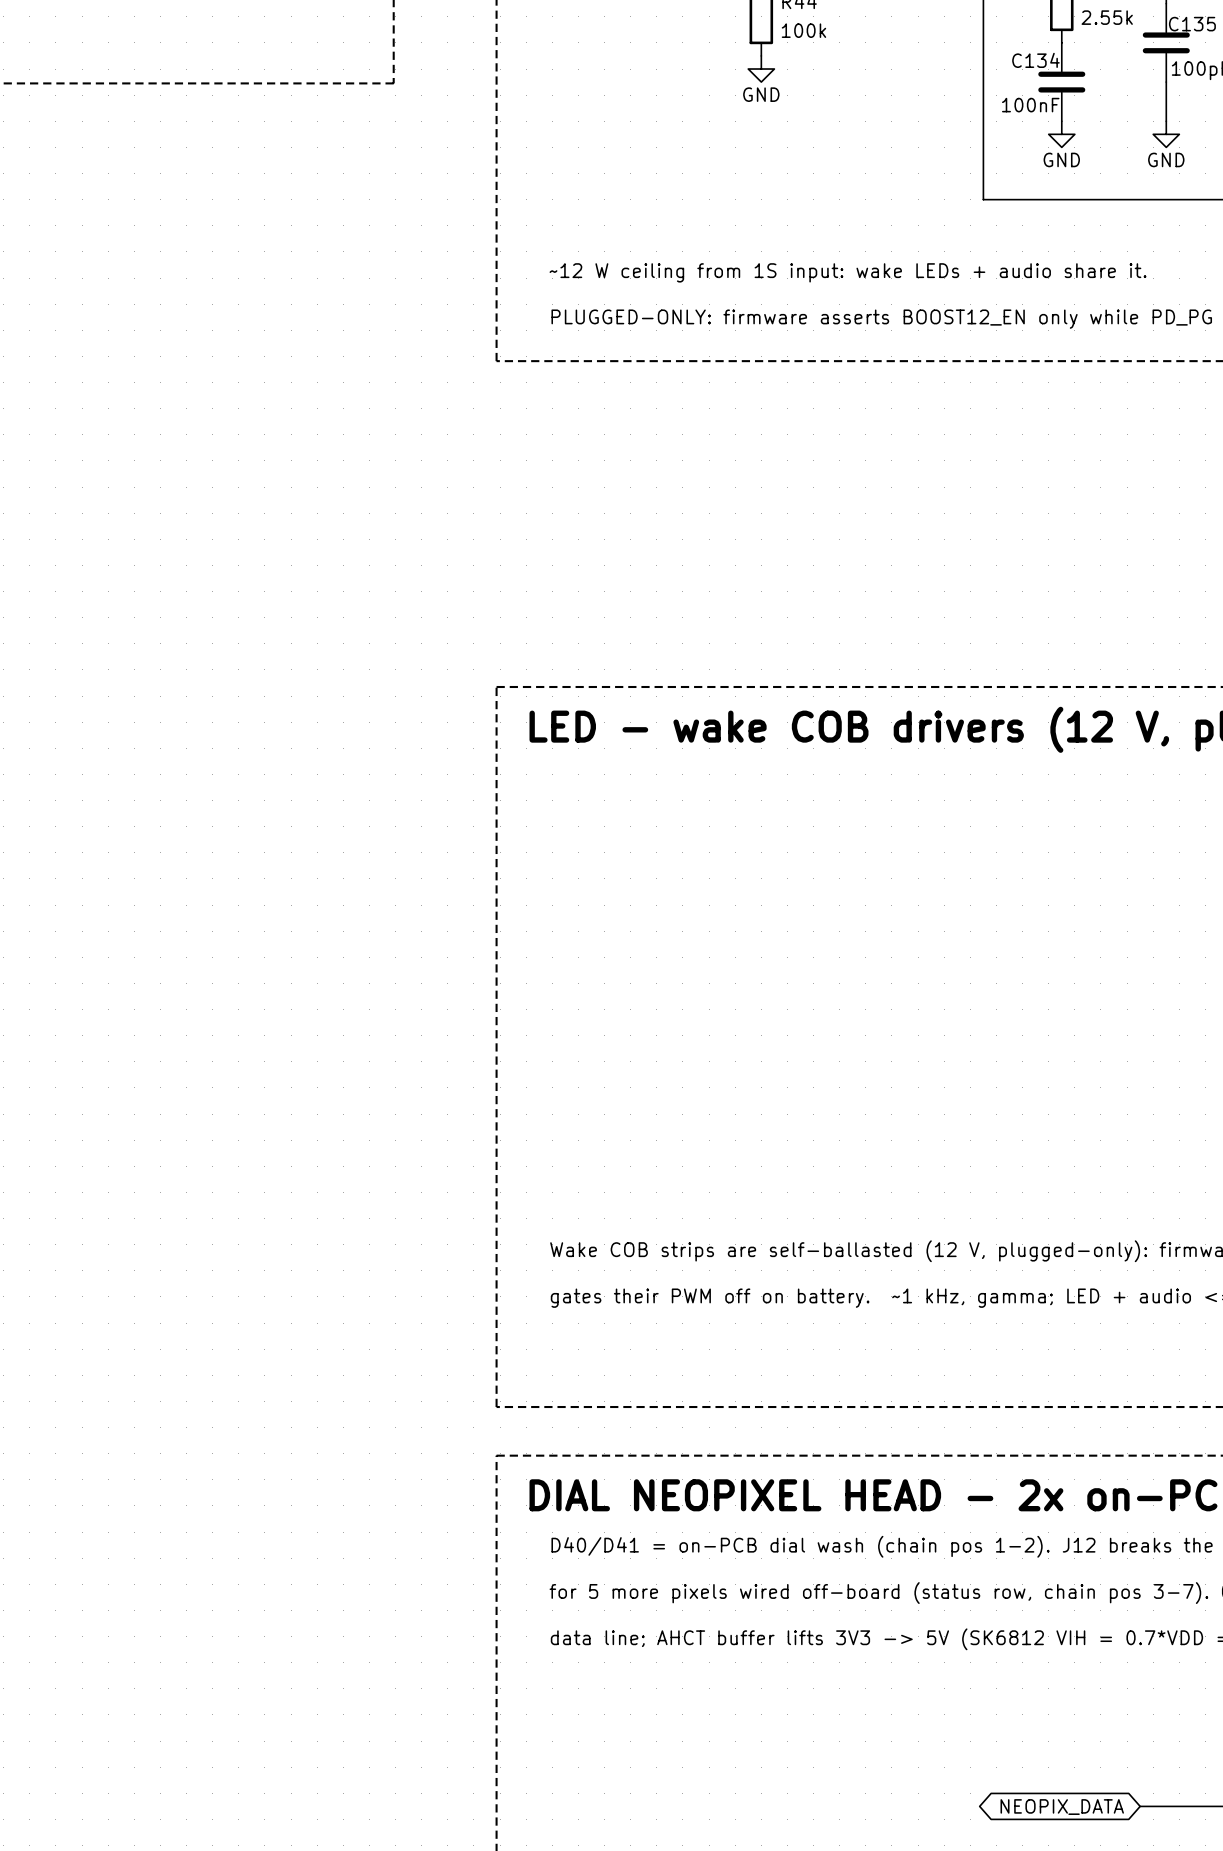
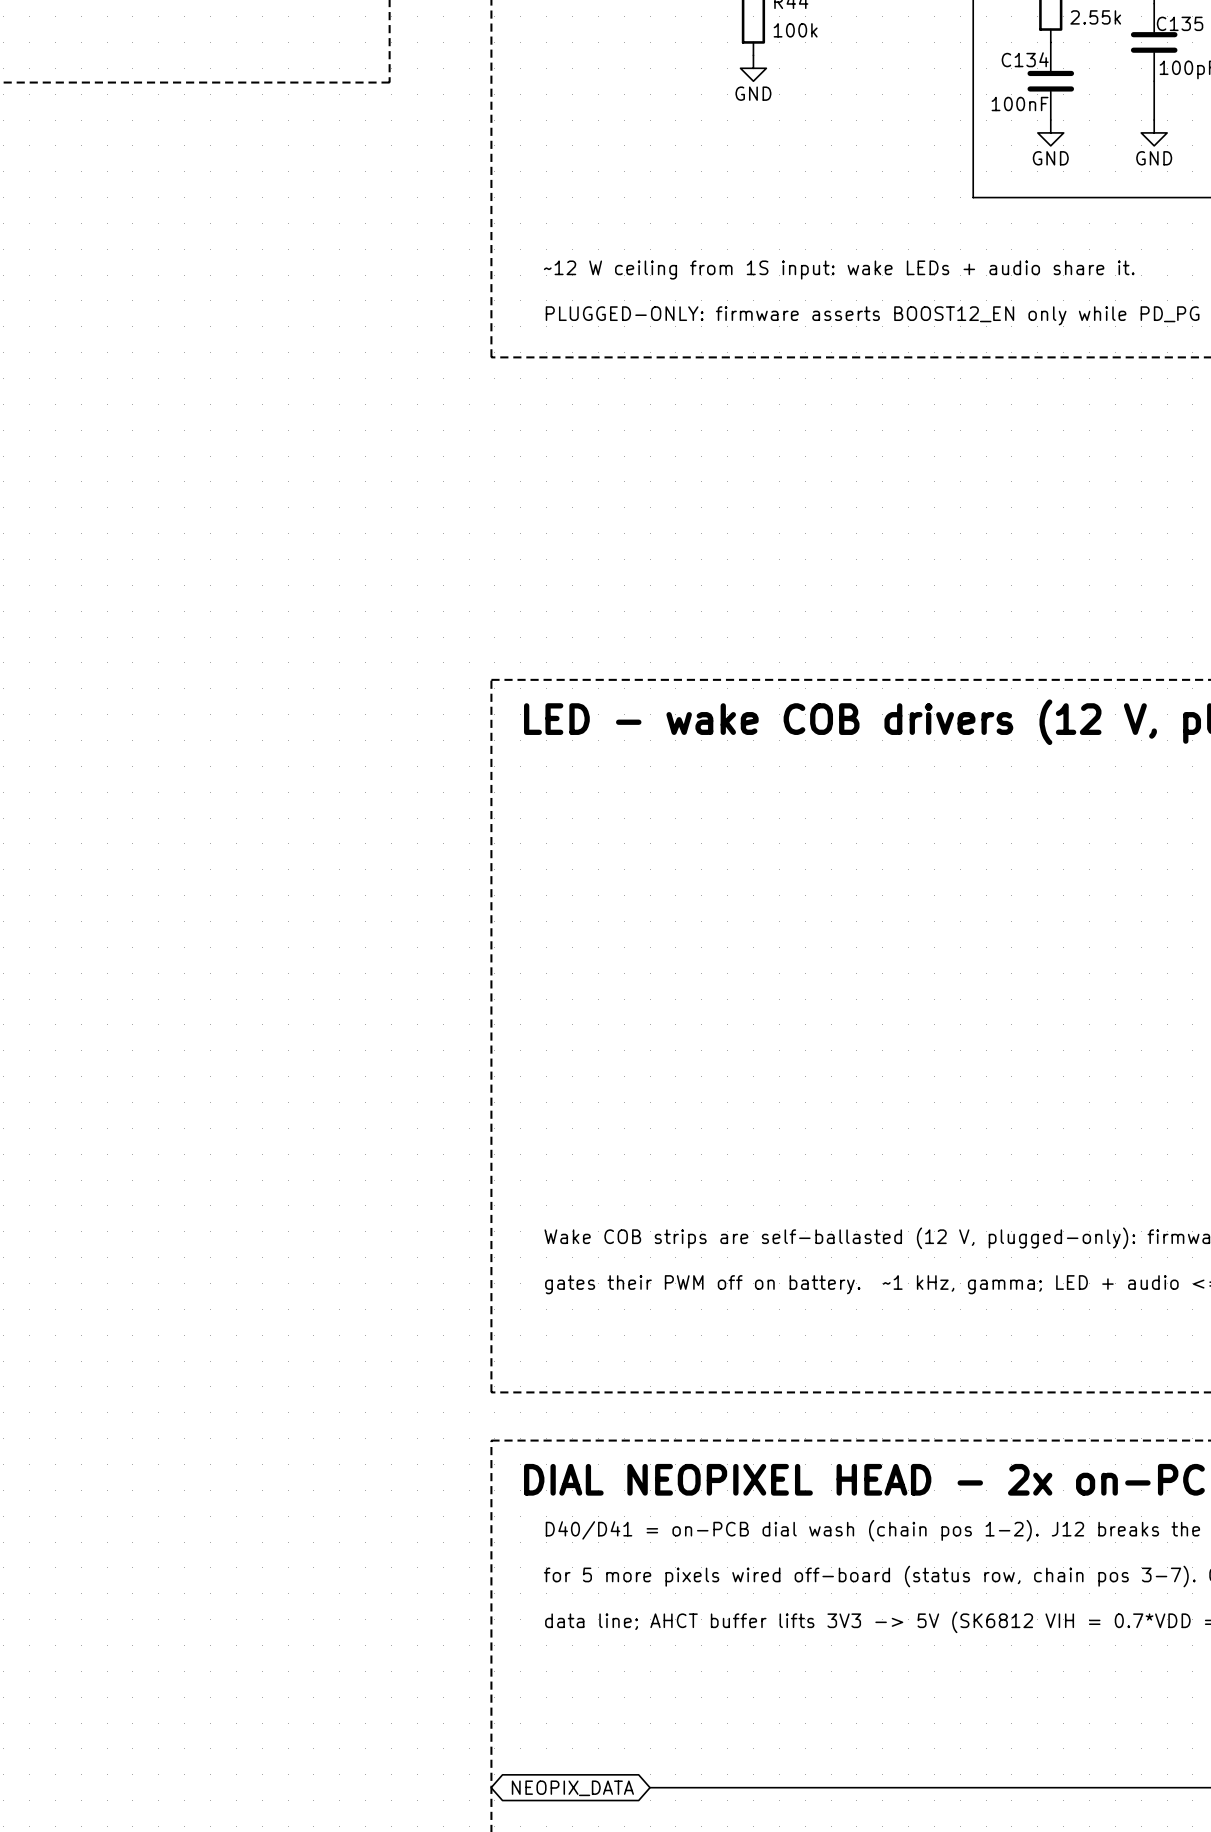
wire: none -> (650, 1787) (1128, 1787)
global label: none -> NEOPIX_DATA (572, 1788)
global label: NEOPIX_DATA (1062, 1807) -> none

